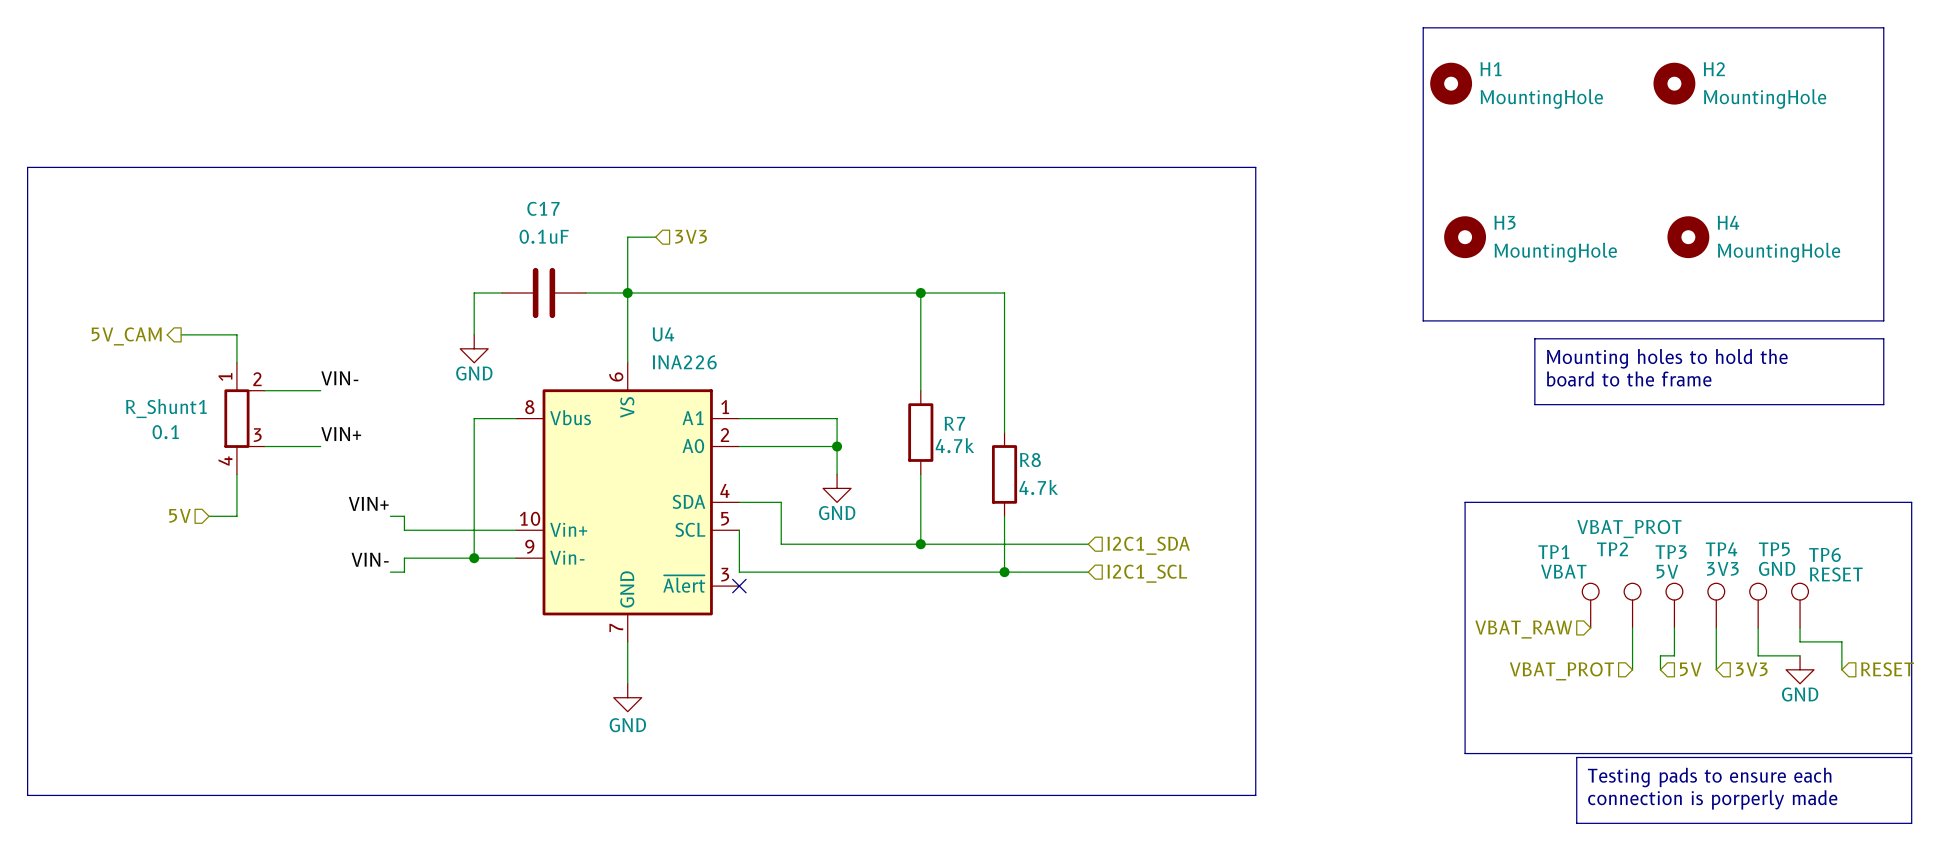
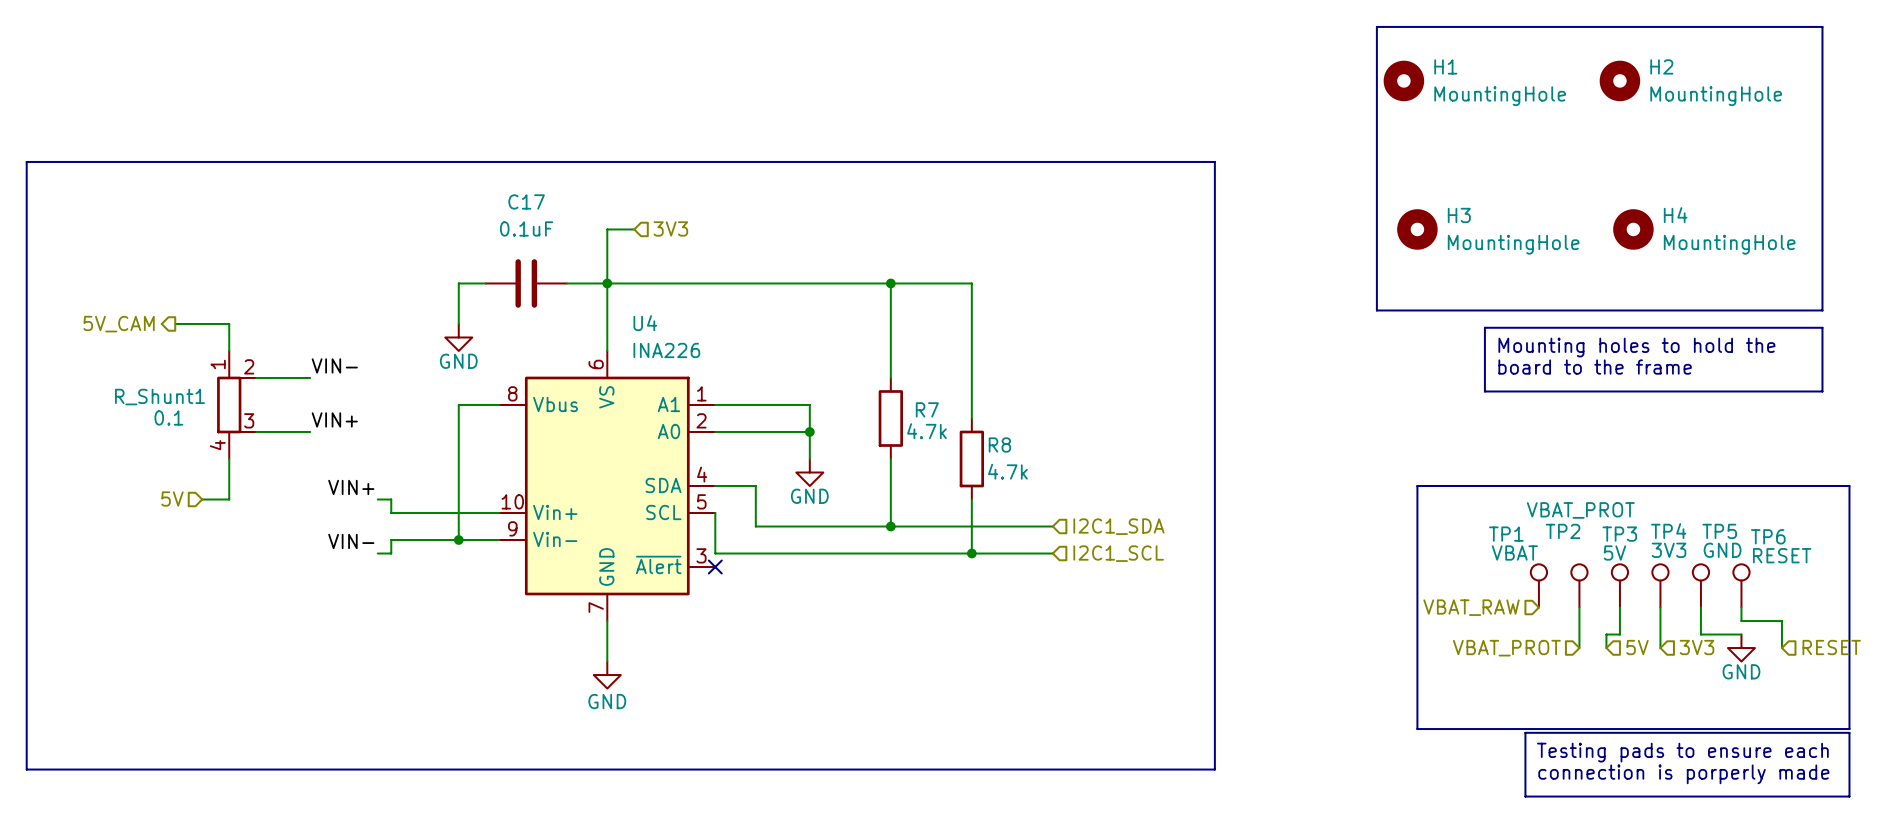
0.1 value: R_Shunt1 (166, 408) -> 0.1 (168, 417)
0.1 name: 0.1 (165, 432) -> R_Shunt1 (159, 397)

